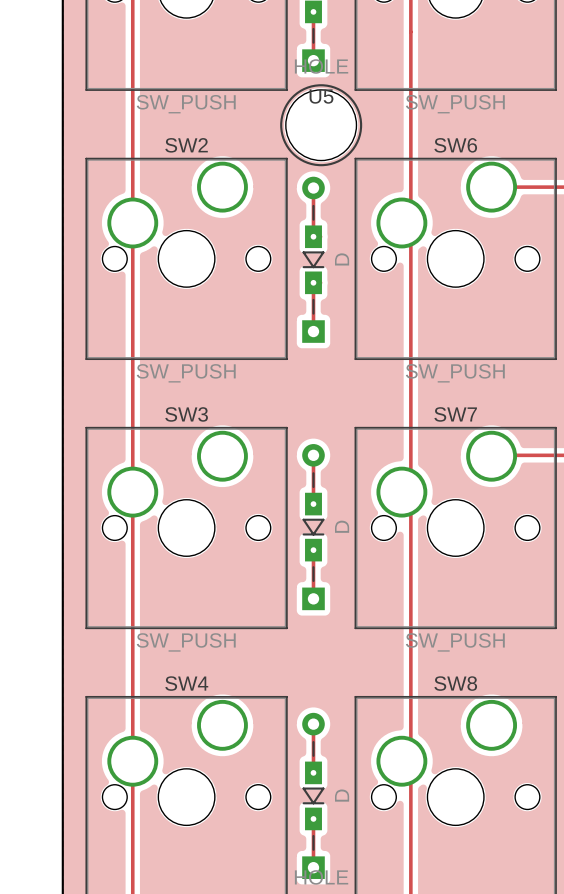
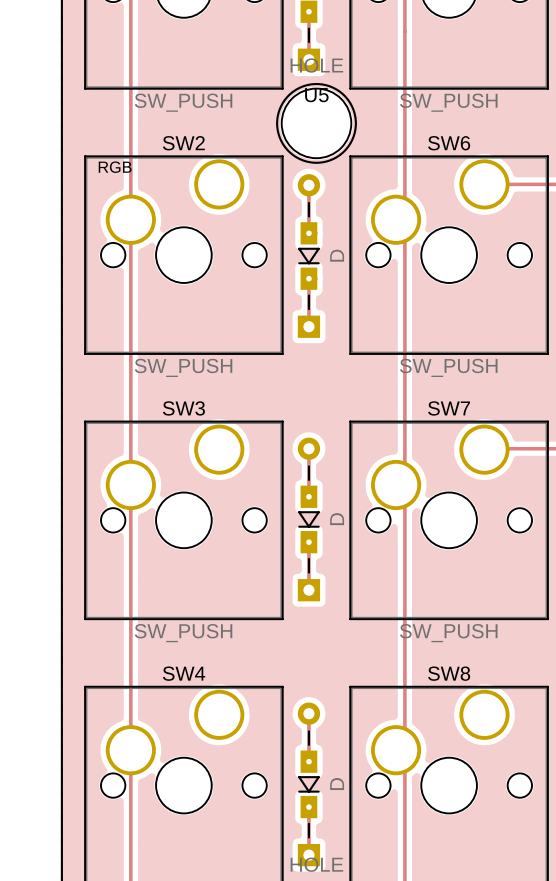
text: none -> RGB (115, 167)

